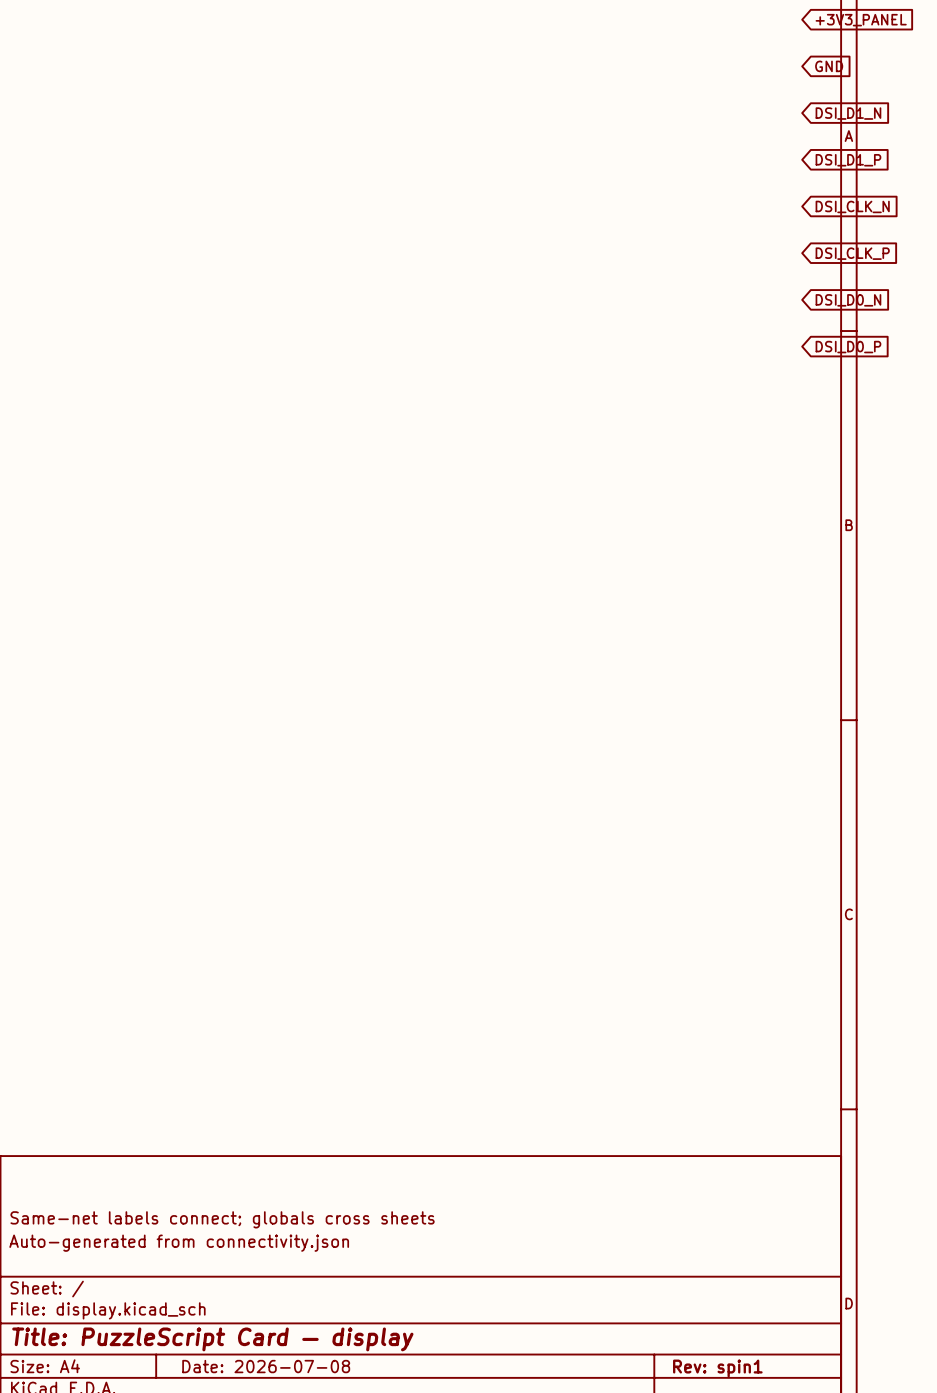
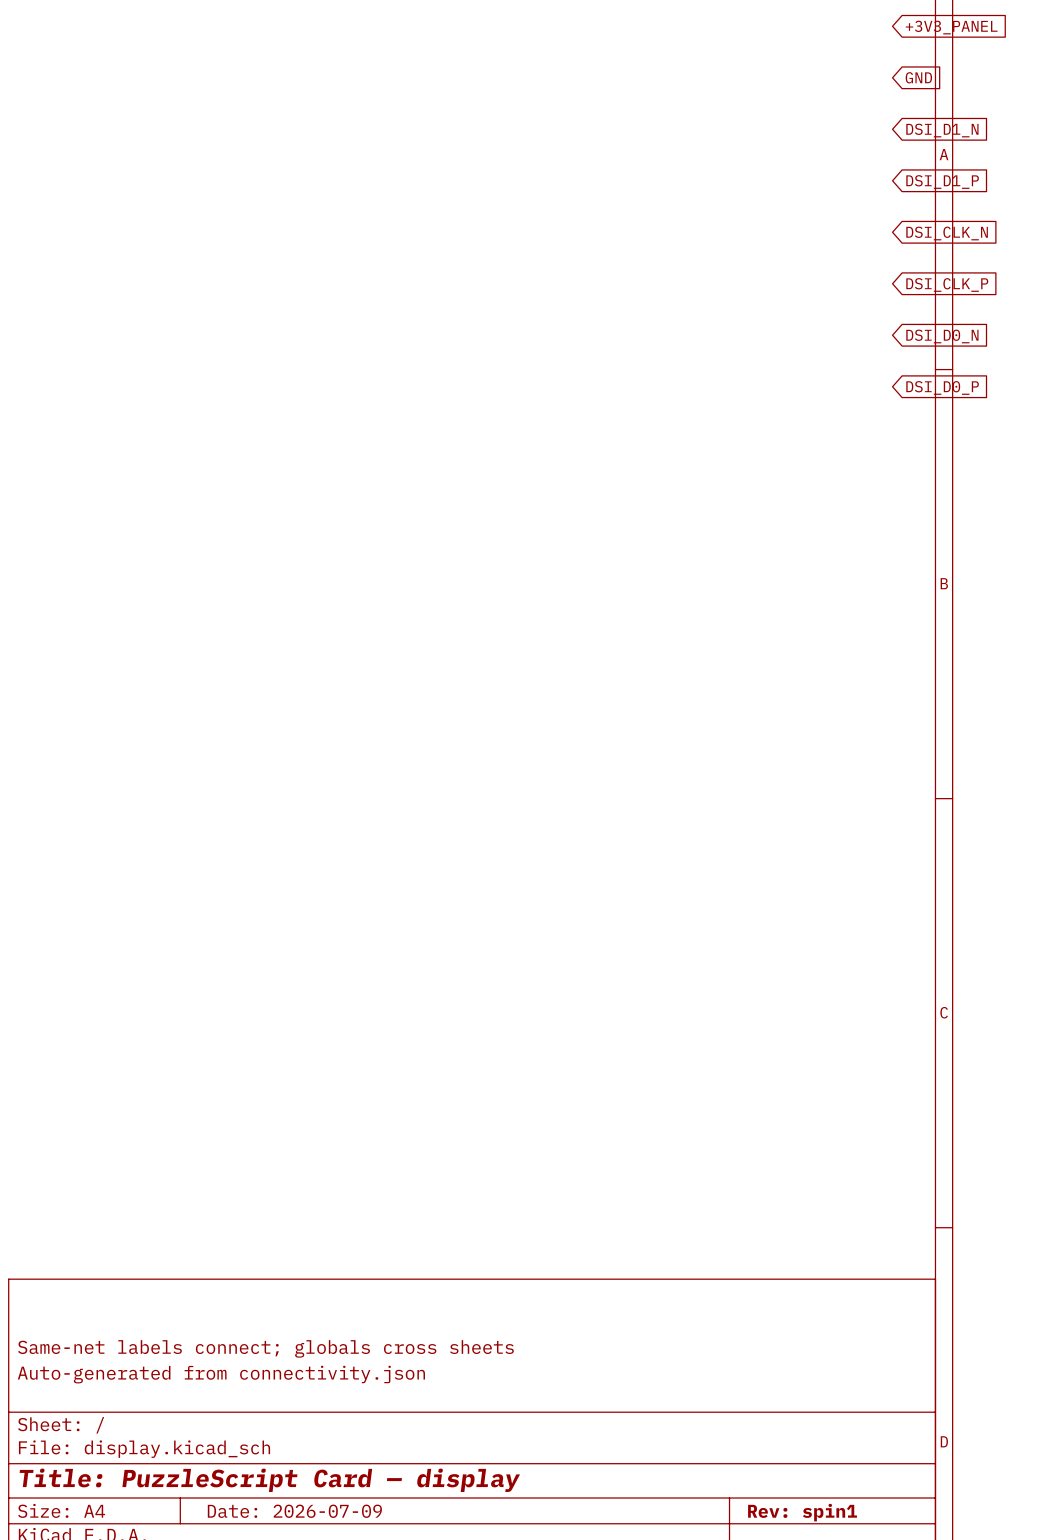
title block: Date: 2026-07-08 (266, 1366) -> Date: 2026-07-09 (294, 1511)

